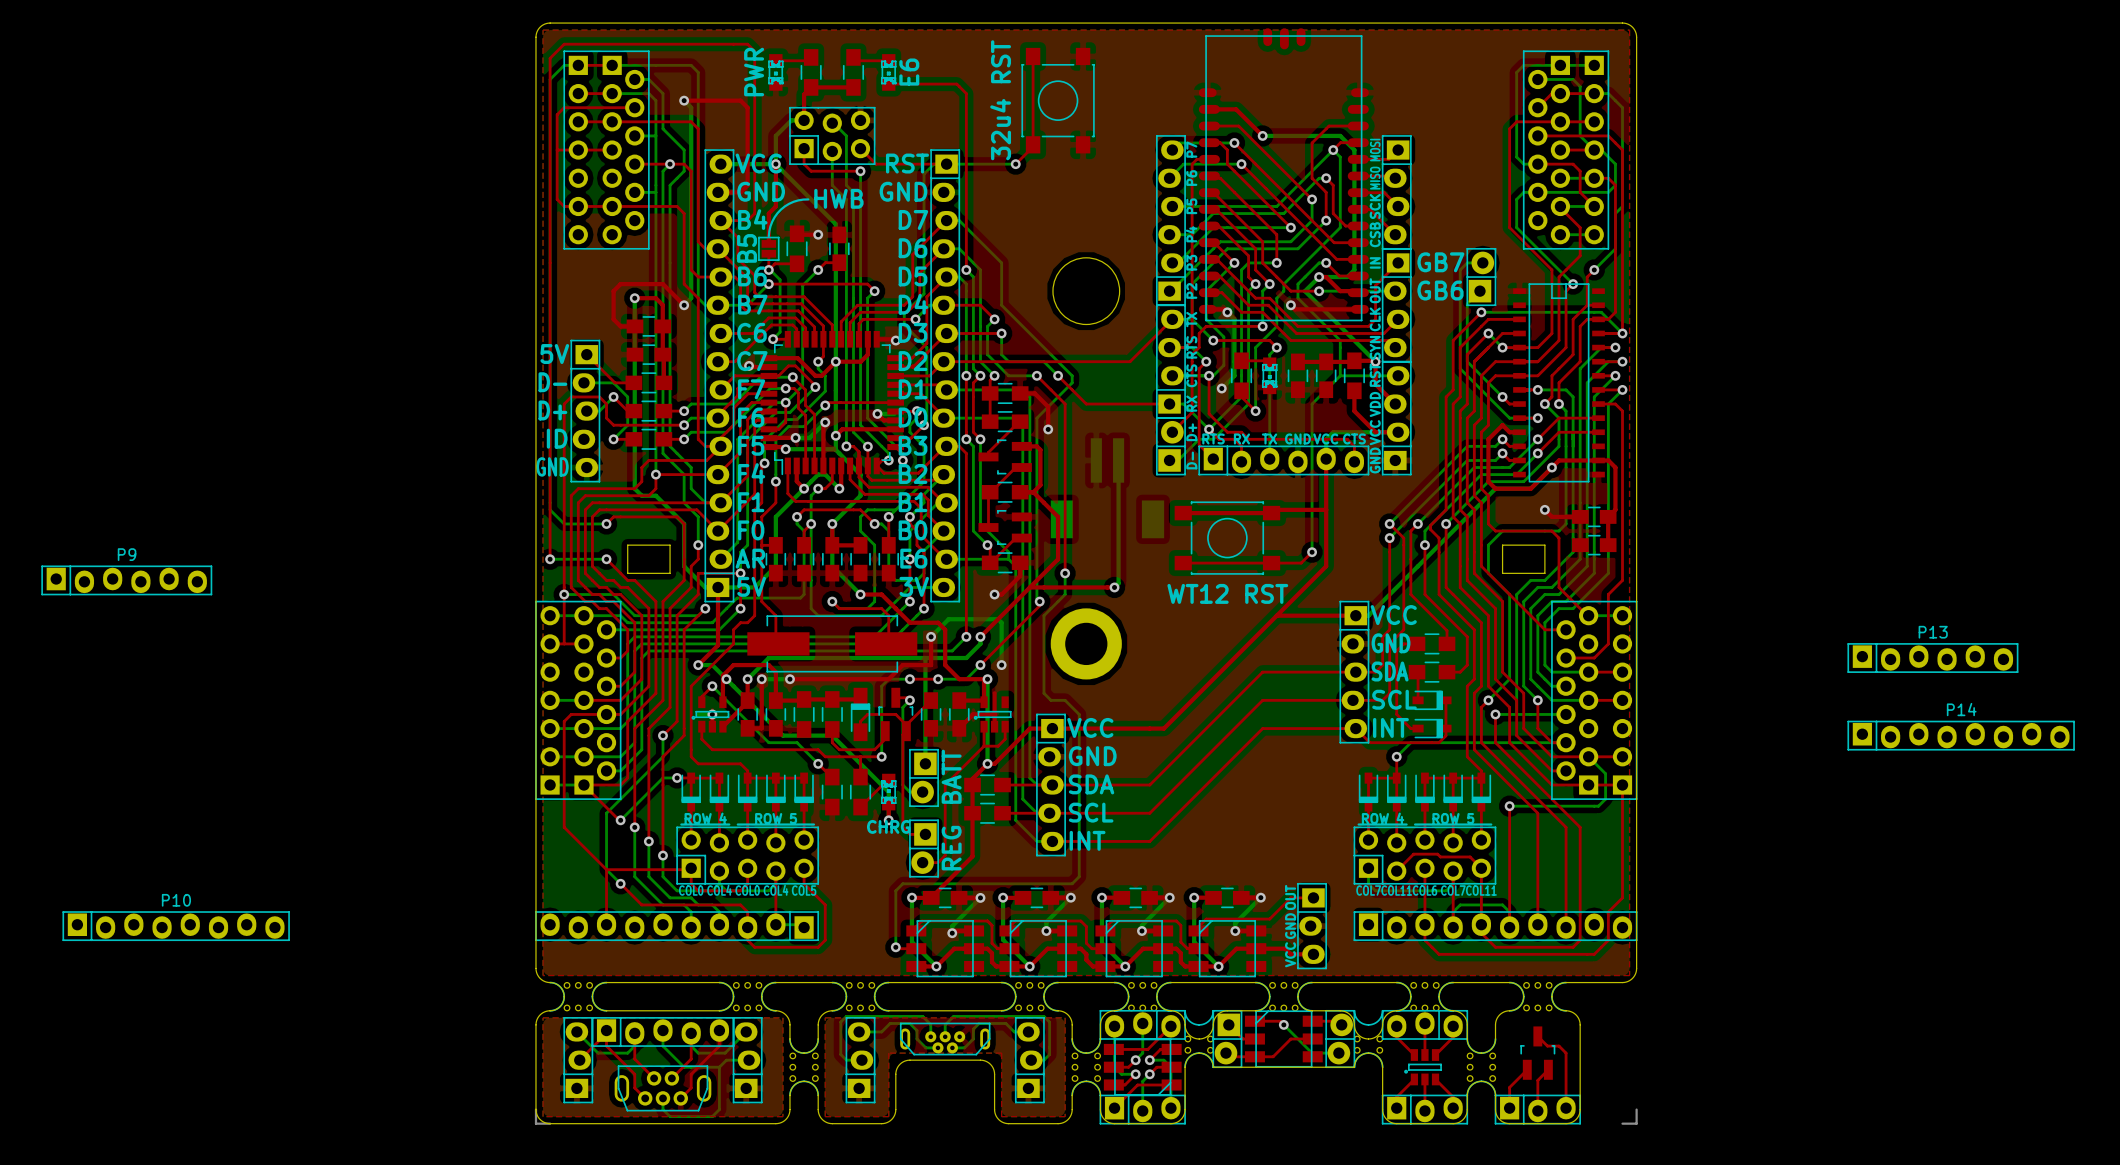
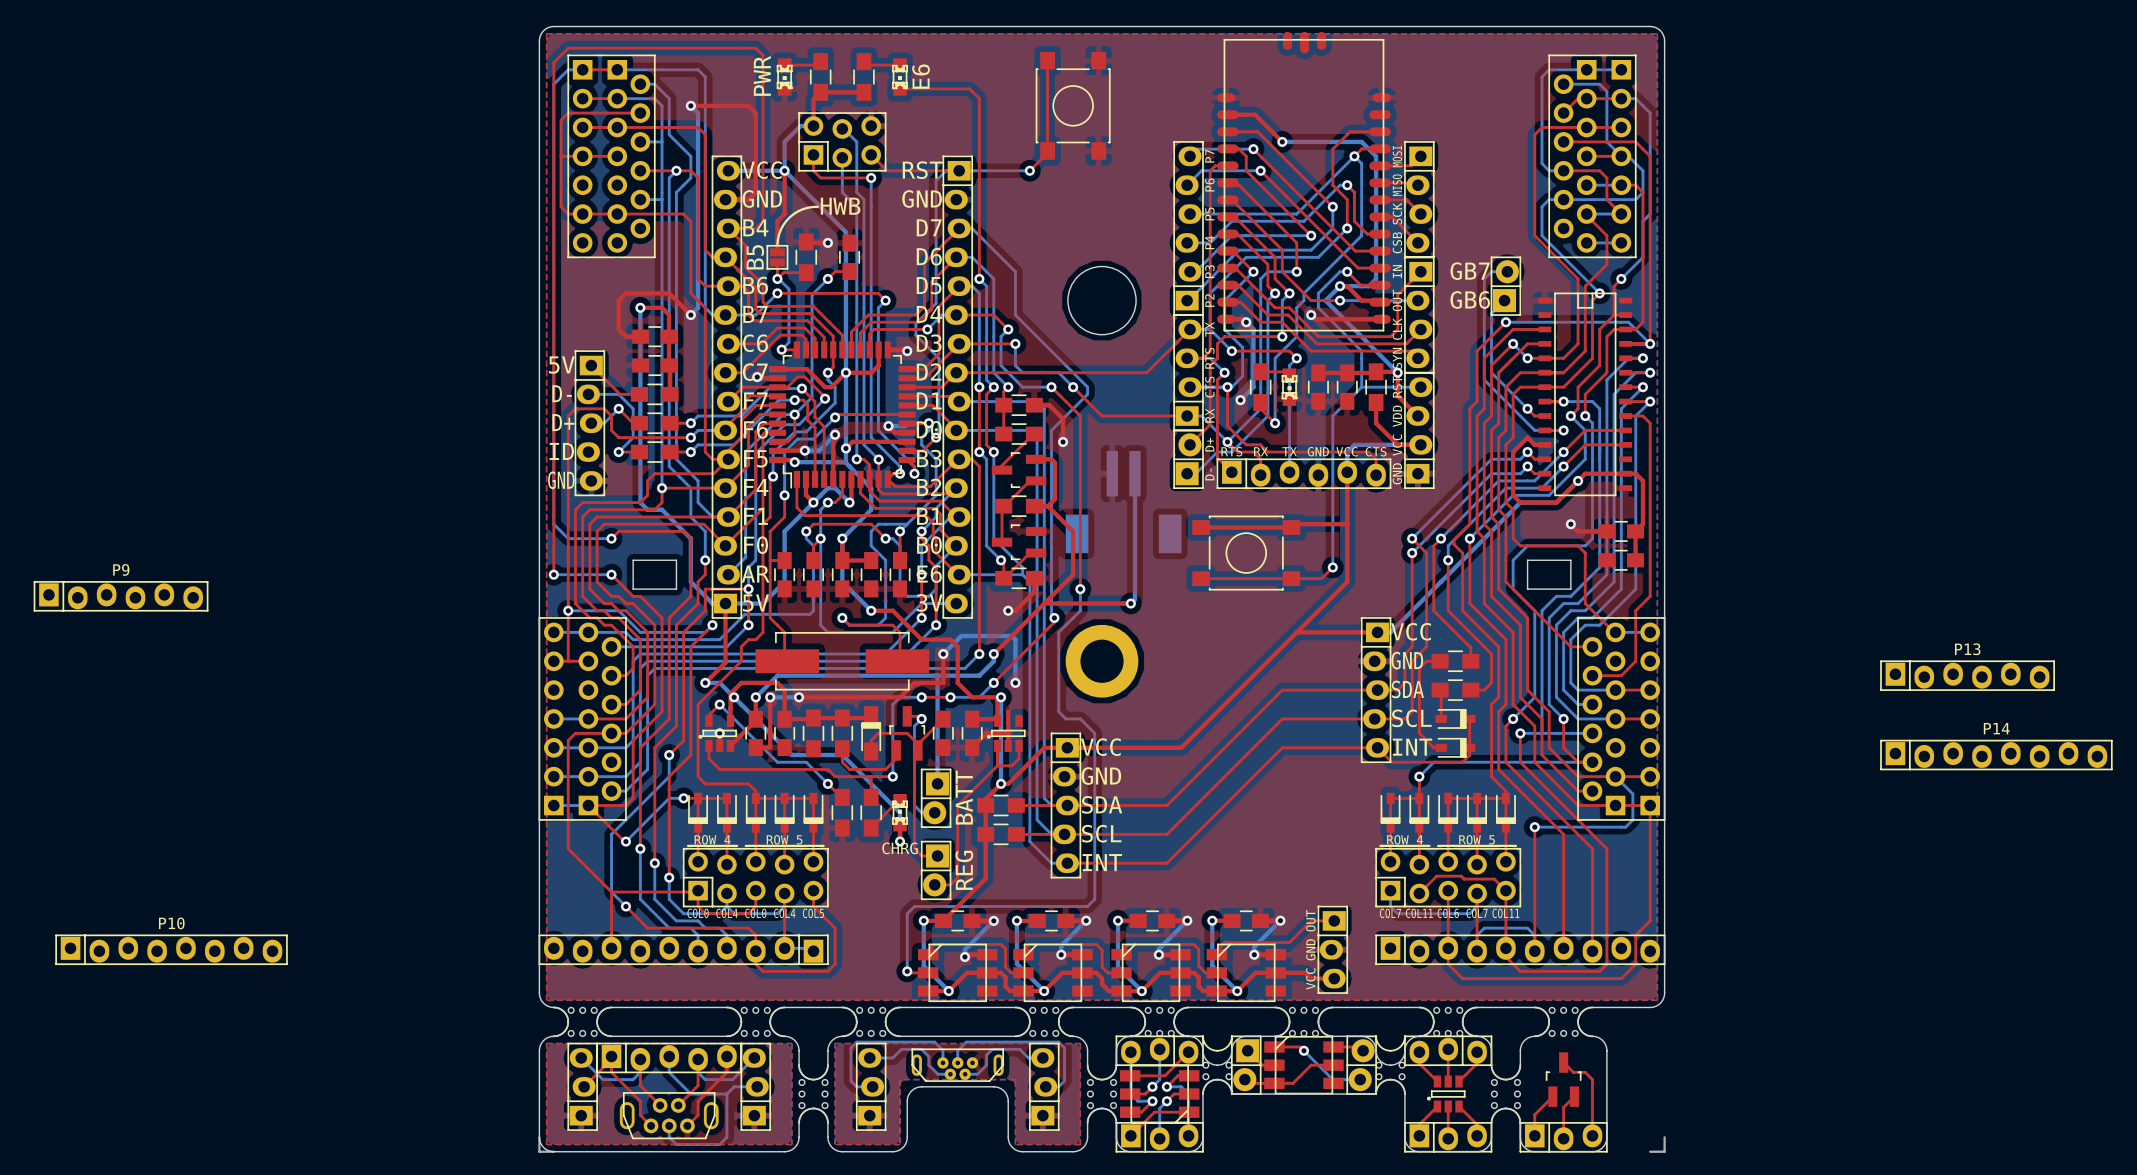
text: 32u4 RST (1000, 100) -> none
text: WT12 RST (1227, 593) -> none

